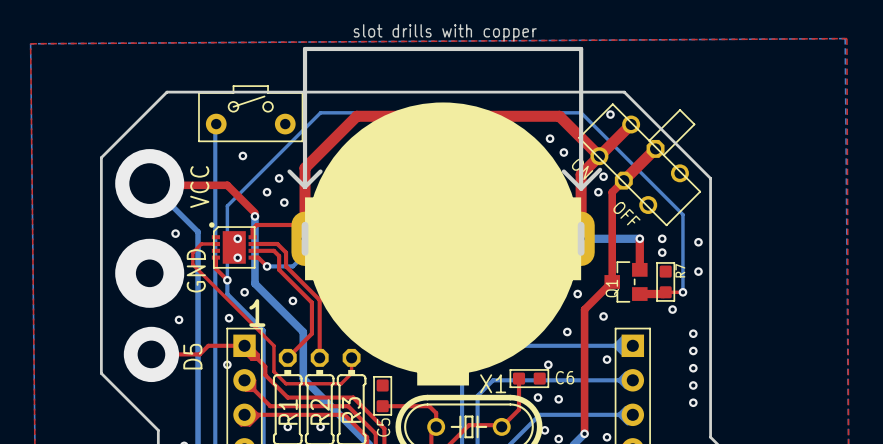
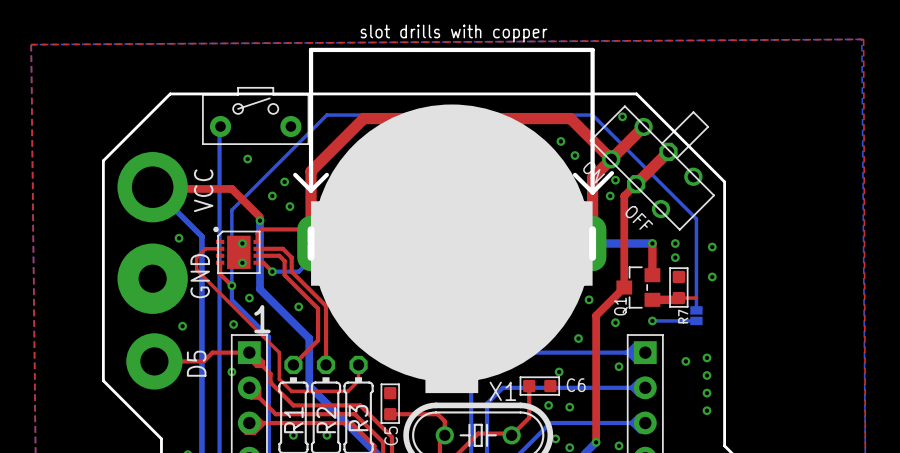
R7 name position: R7 (680, 270) -> R7 (683, 316)
Q1 name position: Q1 (612, 288) -> Q1 (620, 306)
bottom track: none -> (696, 298) (696, 310)
via: (682, 292) -> none
via: (672, 309) -> none
part: none -> (696, 315)
bottom track: none -> (652, 320) (696, 320)
via: none -> (652, 320)
via: (693, 333) -> none
via: none -> (685, 361)

